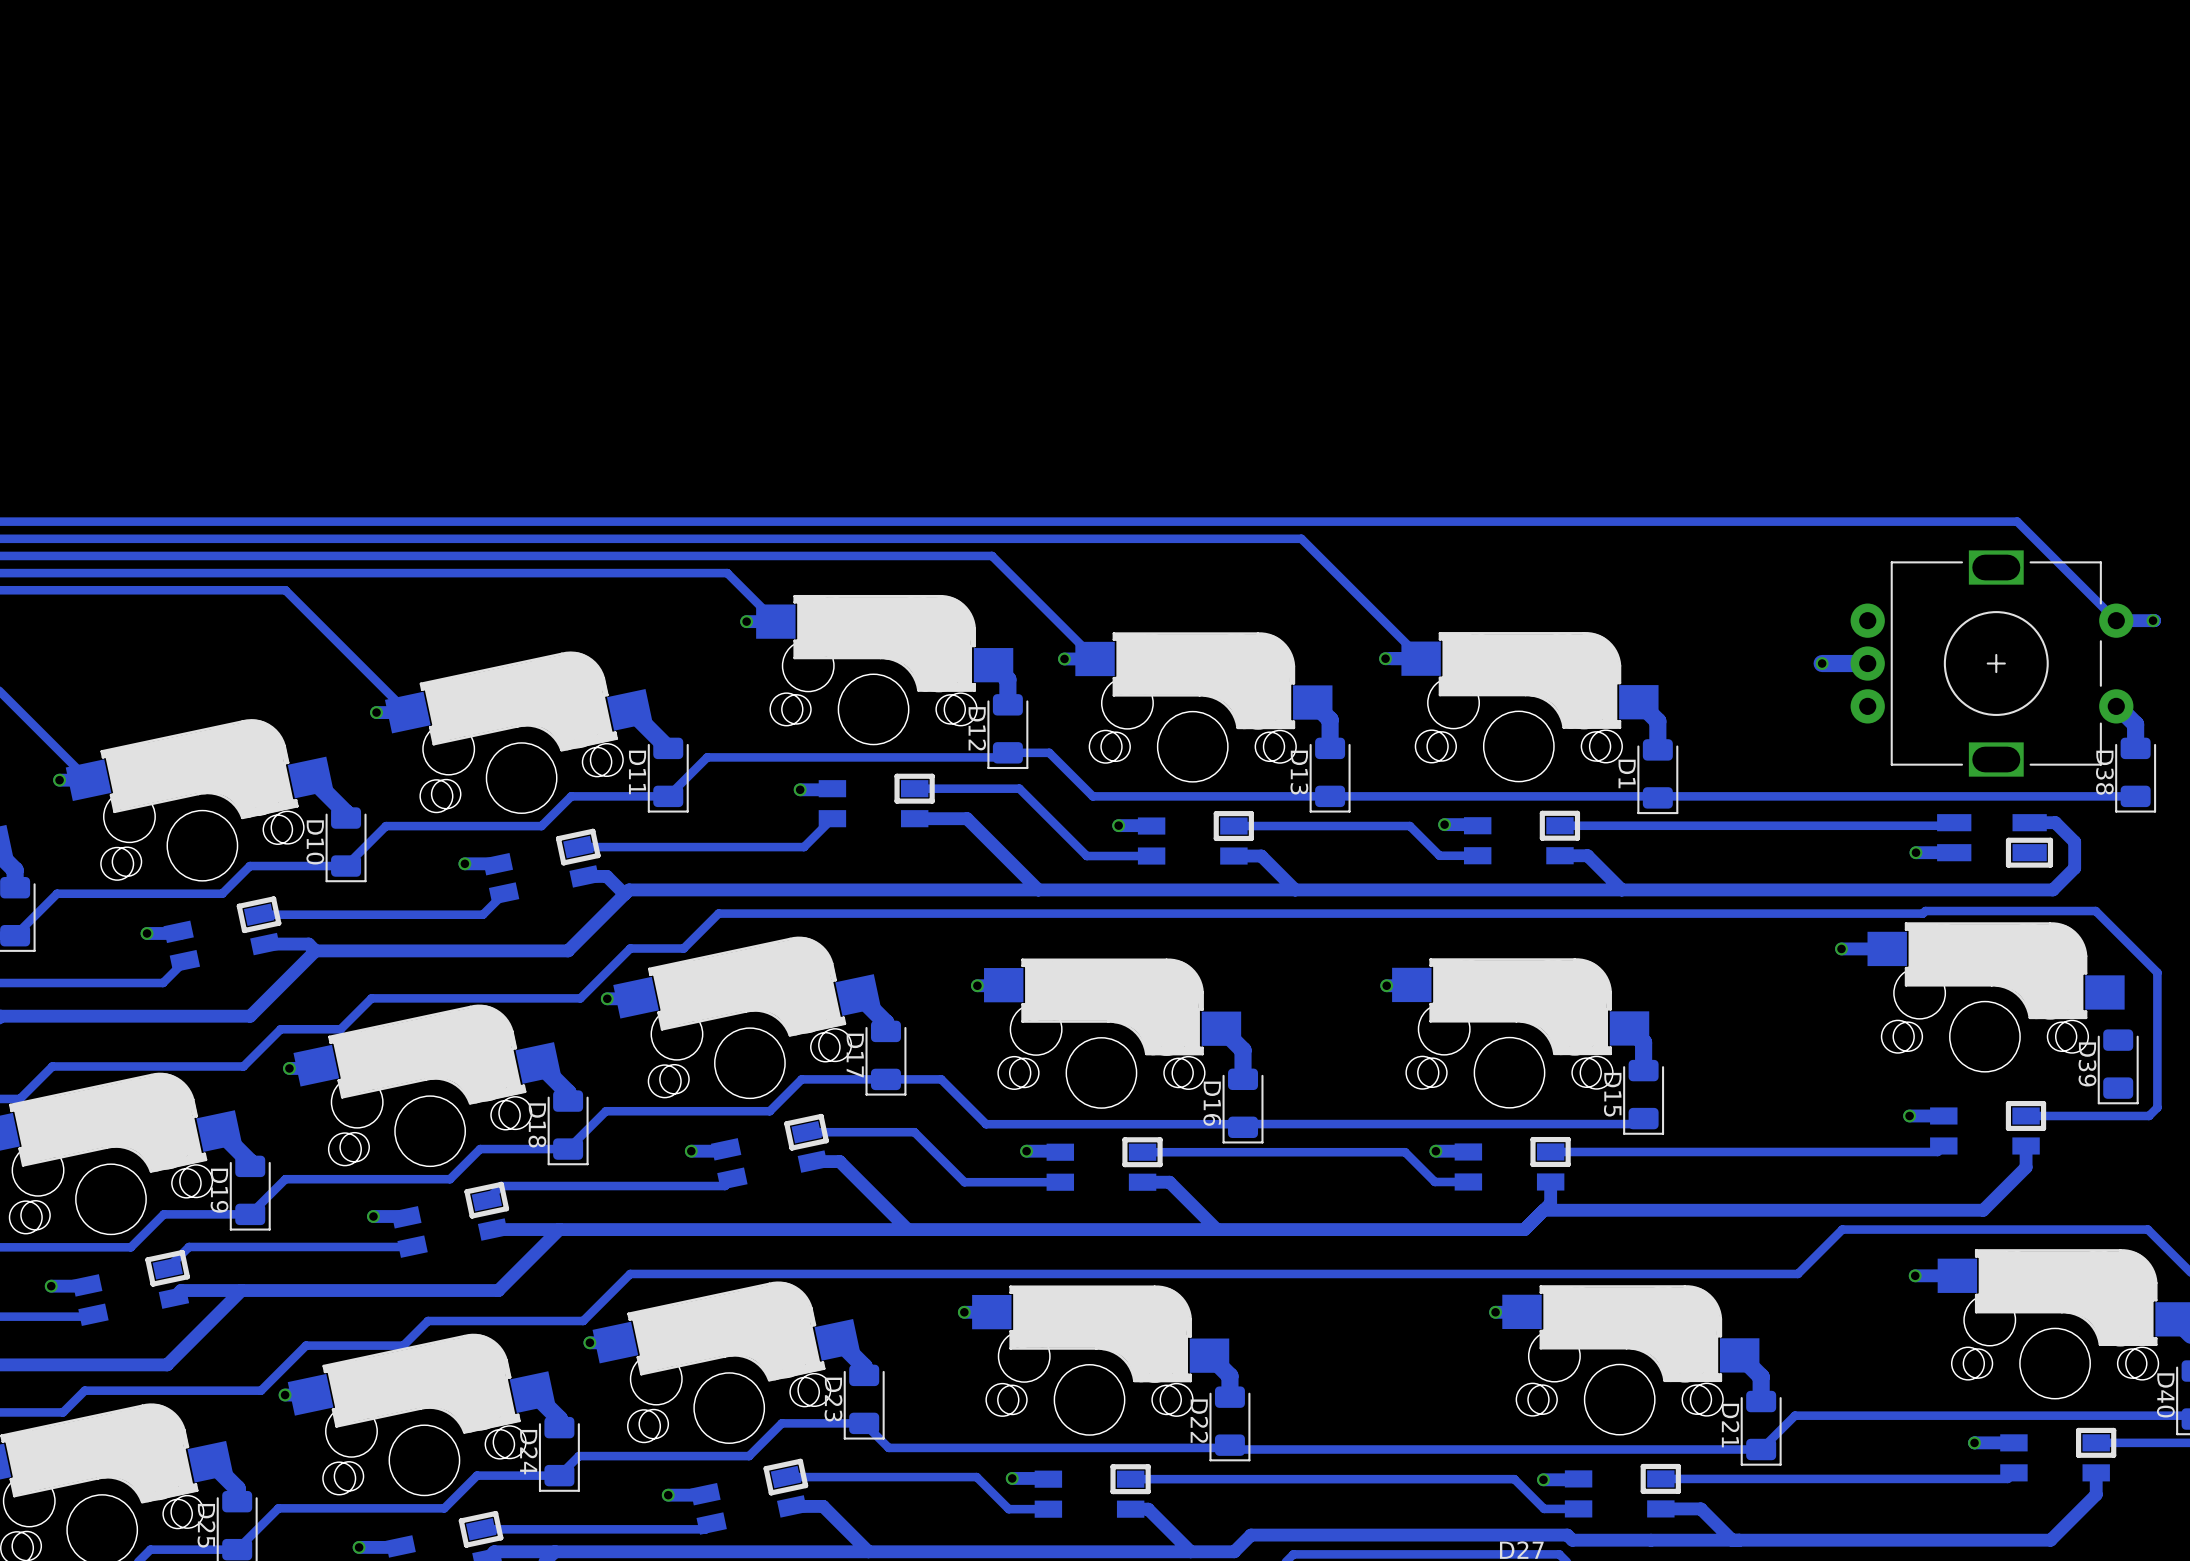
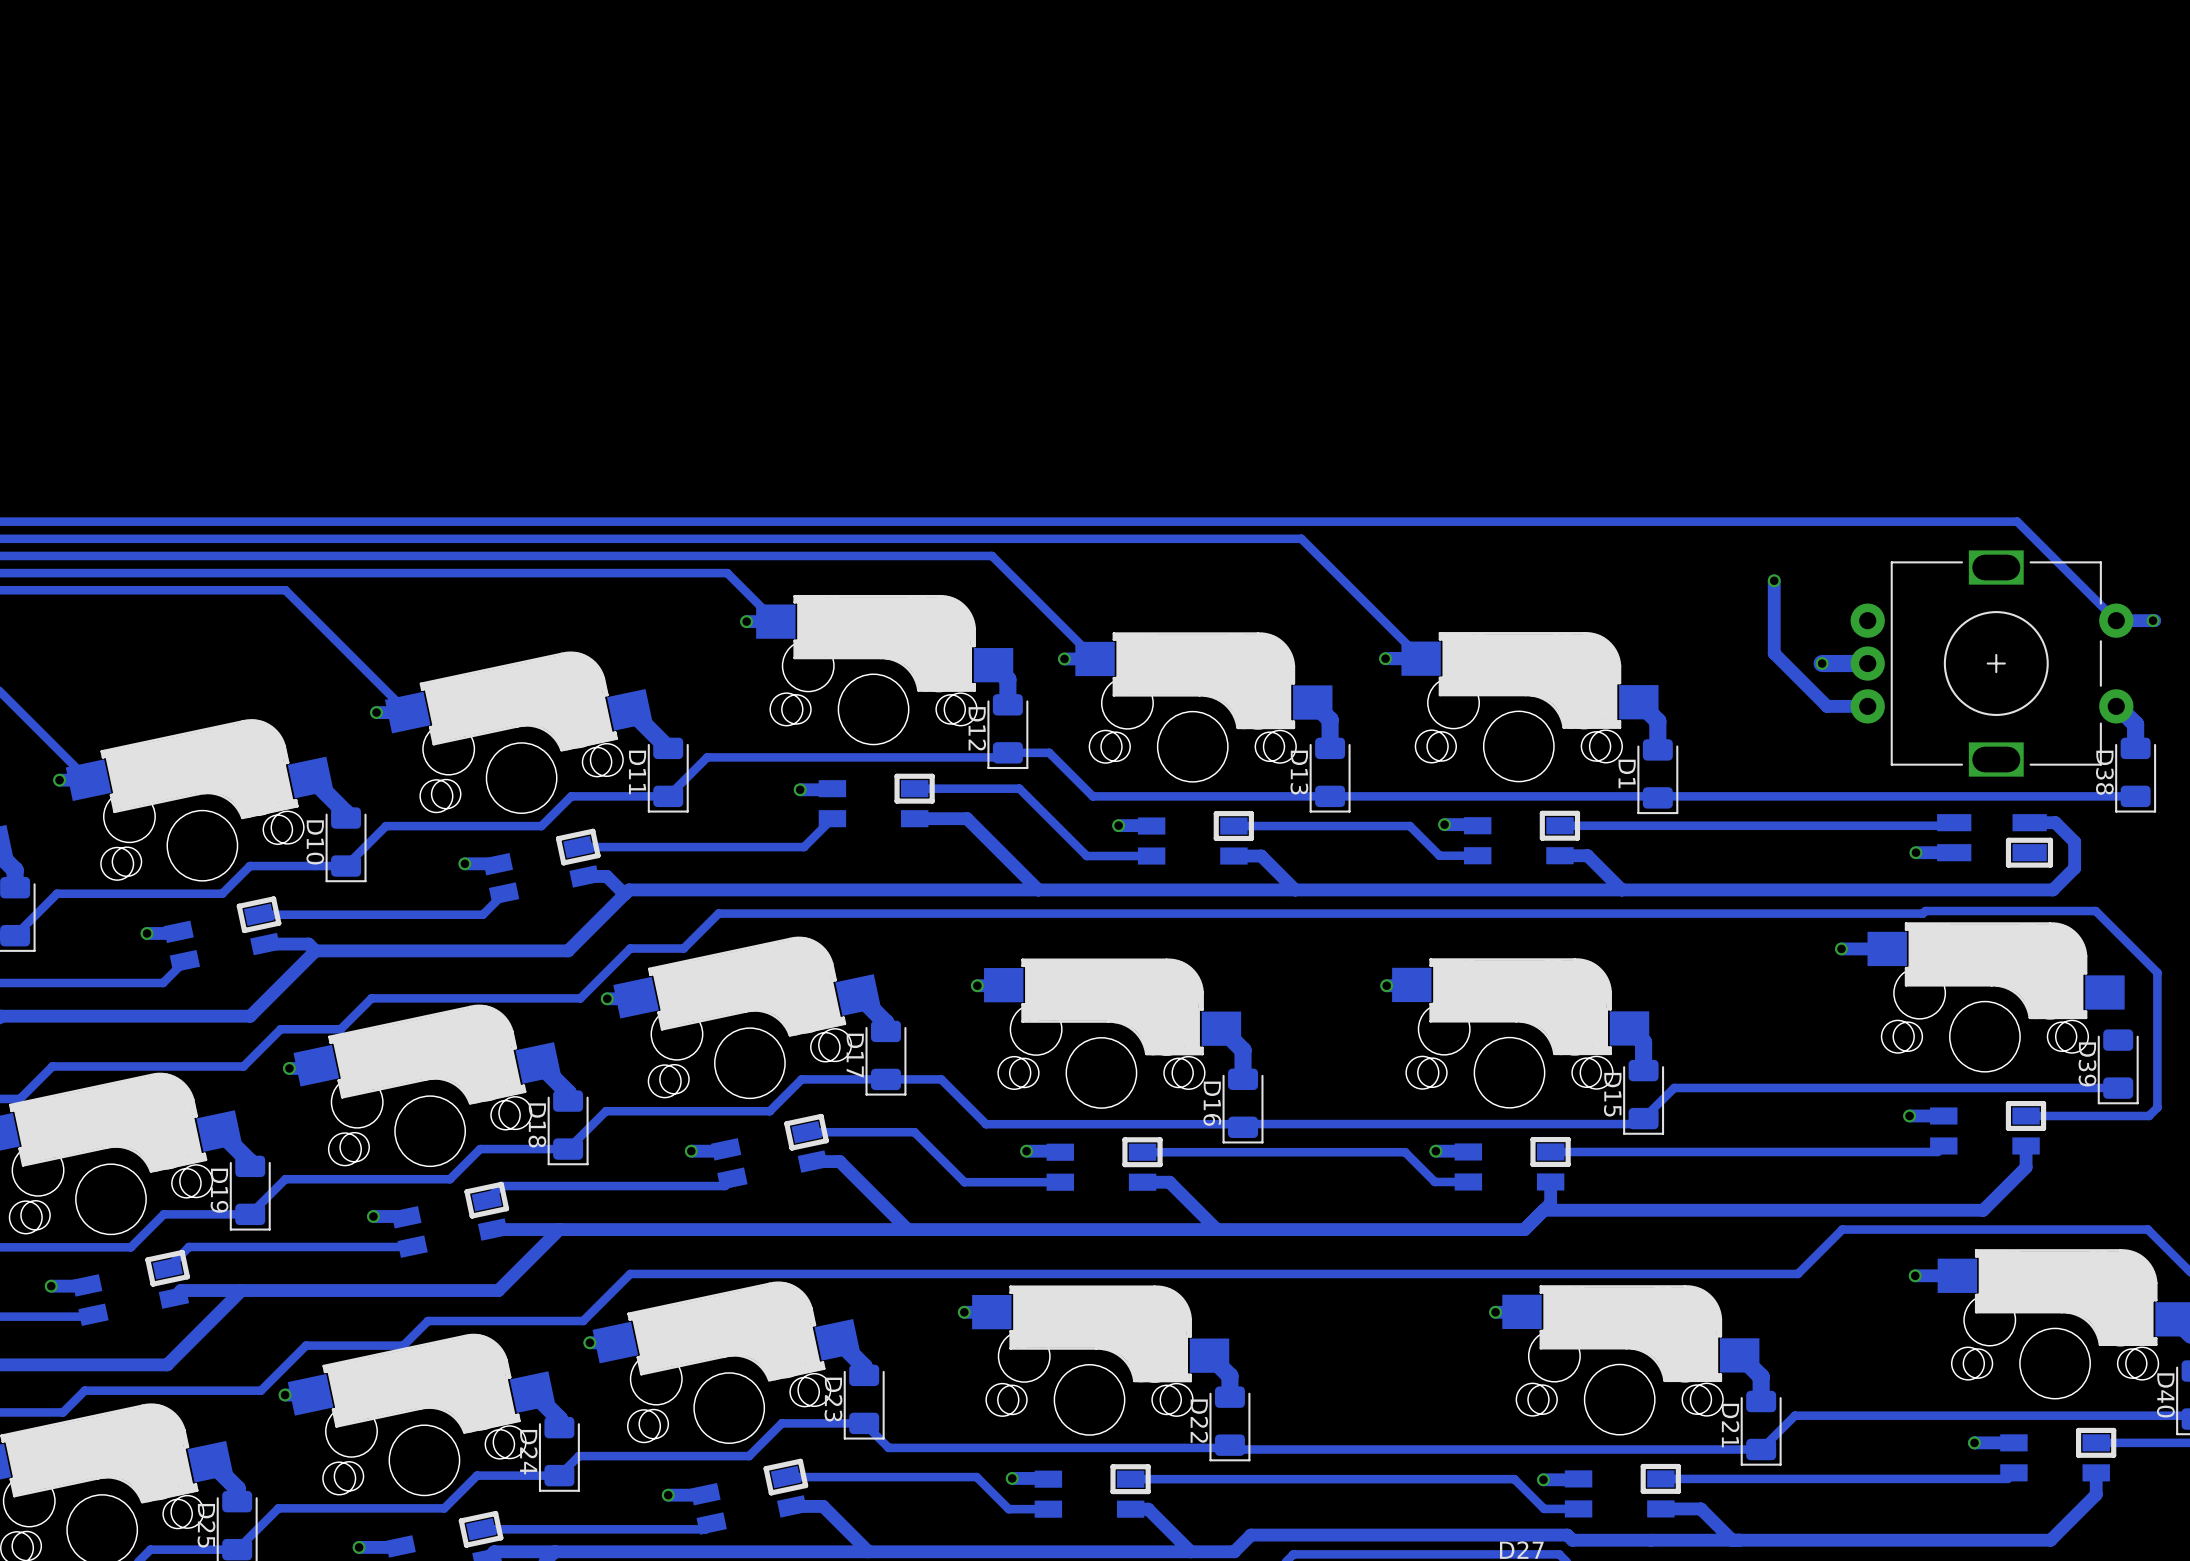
track: none -> (1774, 580) (1774, 653) (1827, 706) (1867, 706)
via: none -> (1774, 580)
track: none -> (2118, 1087) (1674, 1087) (1643, 1118)

